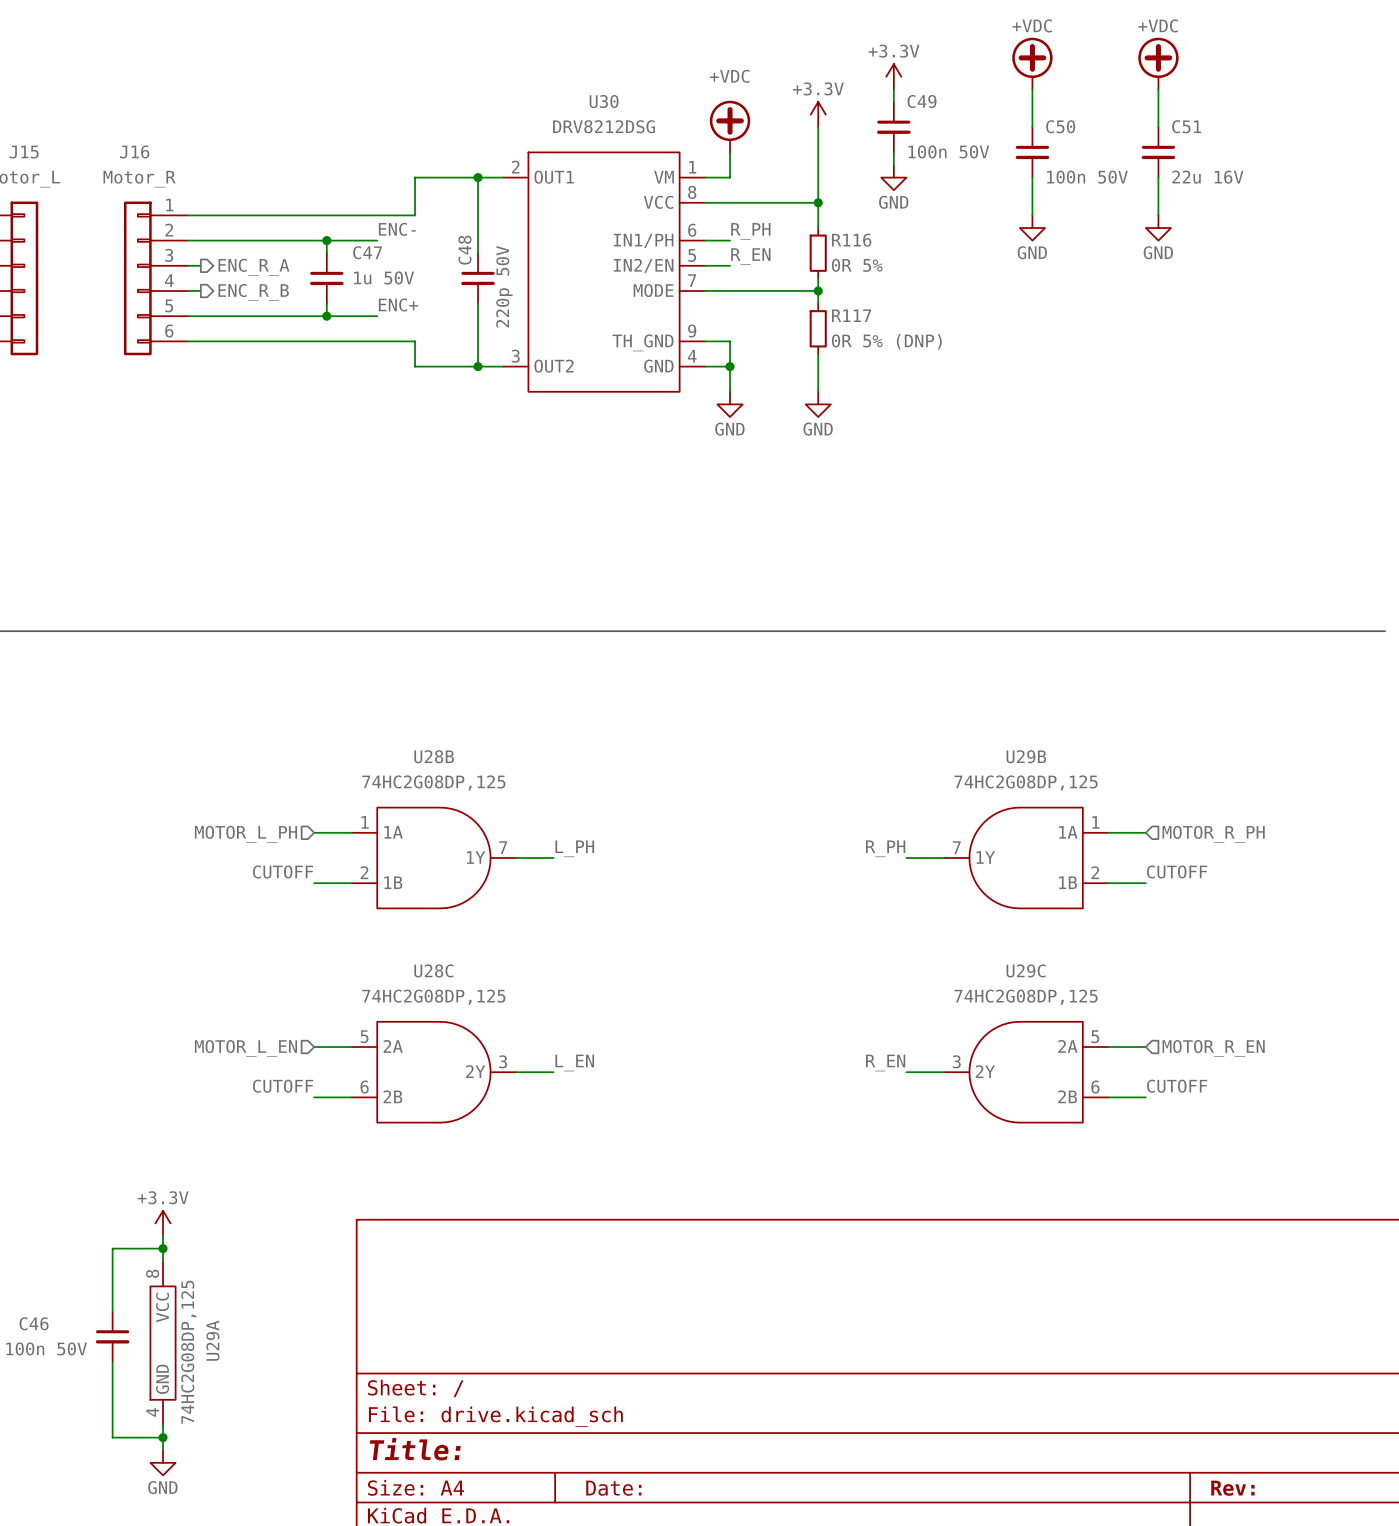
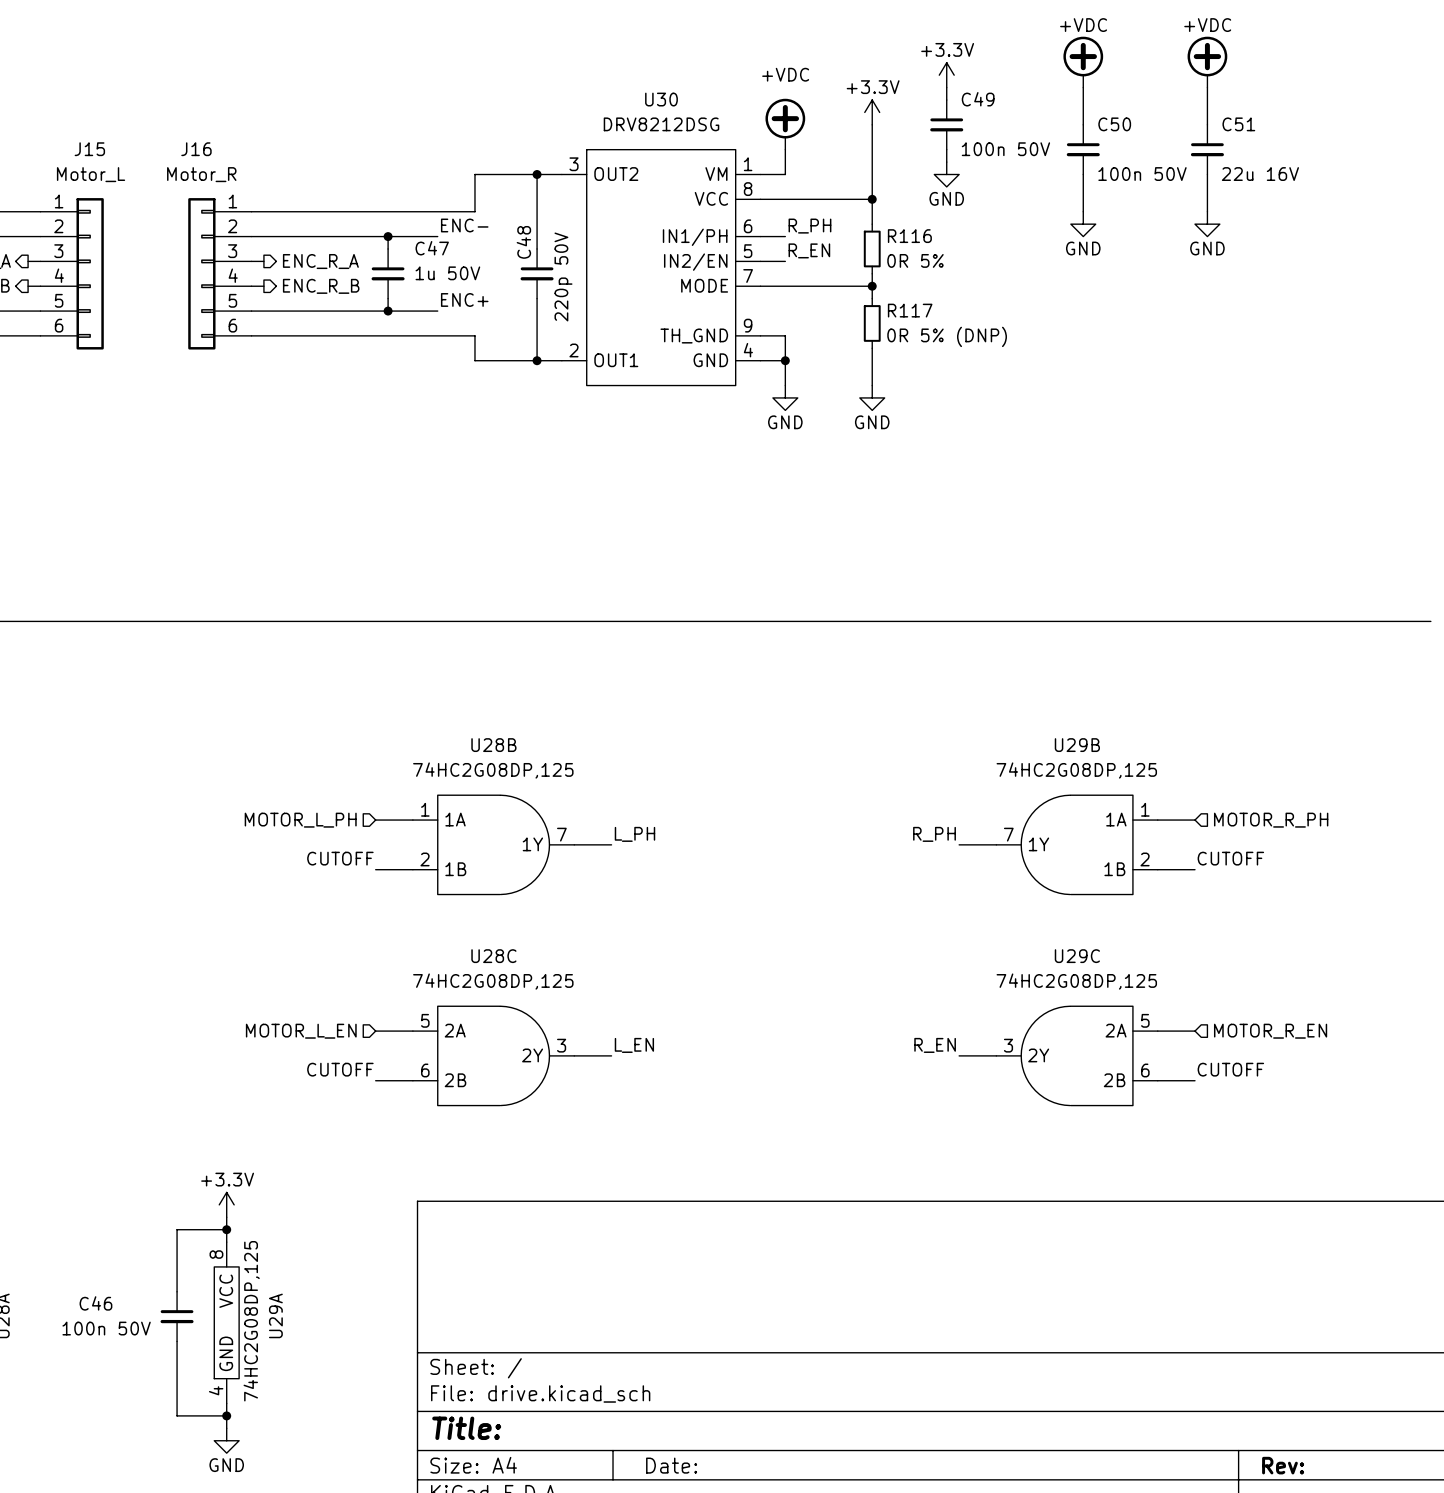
U30 pin number: 2 (515, 167) -> 3 (574, 164)
U30 pin name: OUT1 (554, 177) -> OUT2 (616, 174)
U30 pin number: 3 (515, 356) -> 2 (574, 350)
U30 pin name: OUT2 (554, 366) -> OUT1 (616, 360)

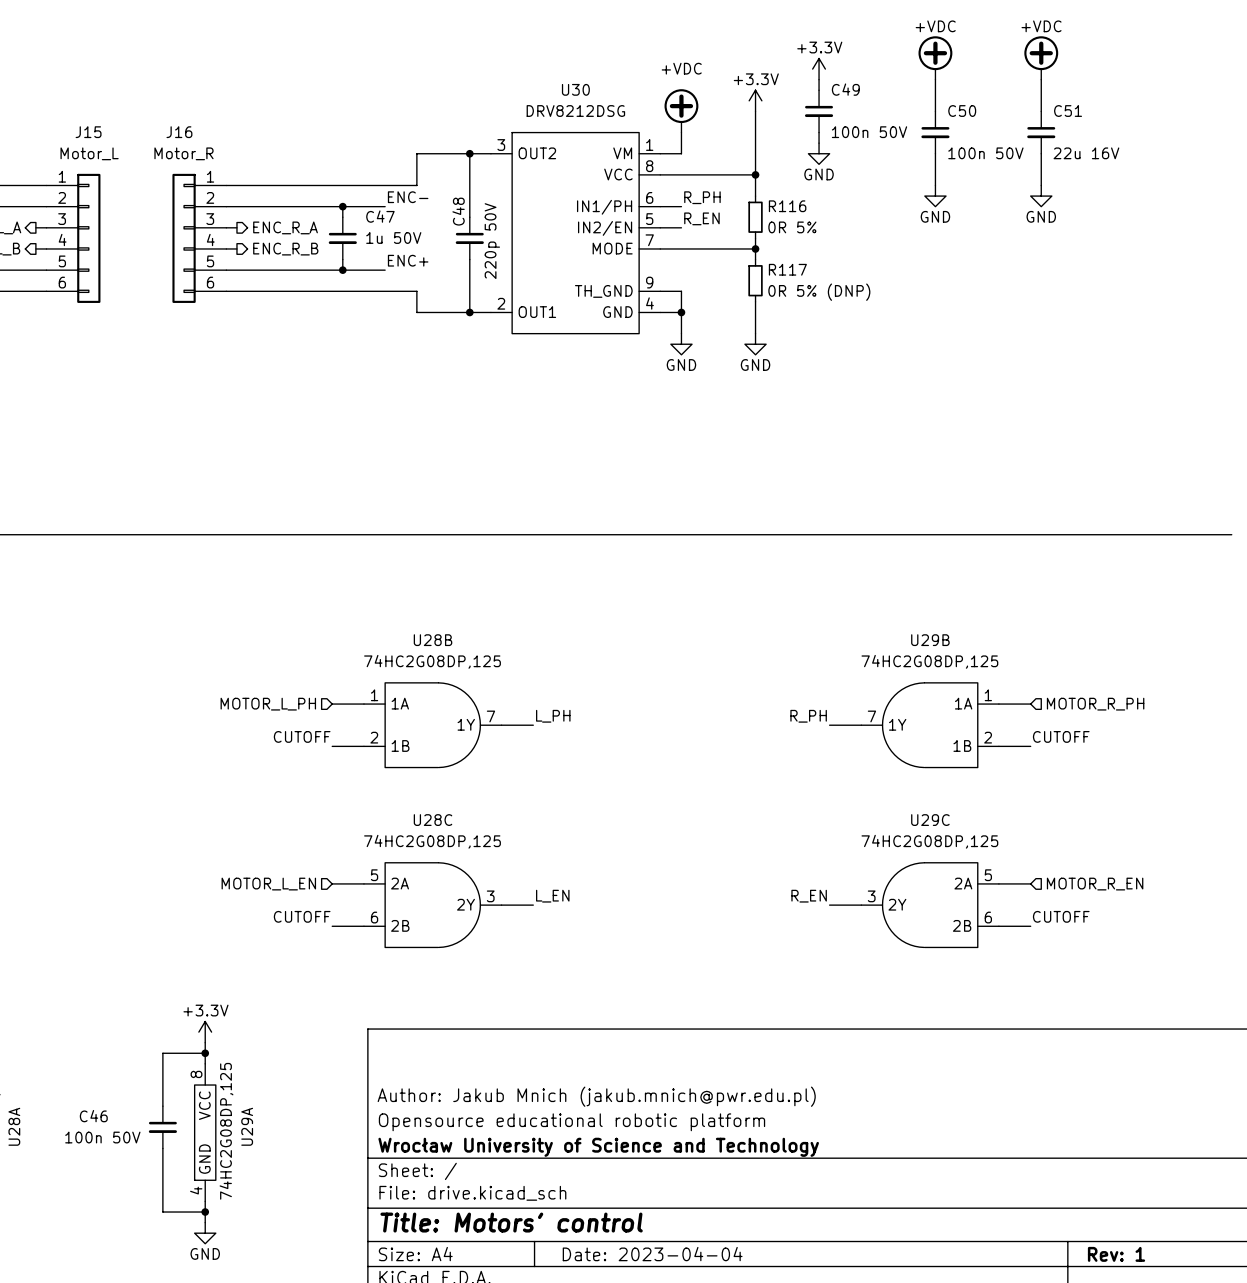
title block: none -> Author: Jakub Mnich (jakub.mnich@pwr.edu.pl) (596, 1096)
title block: none -> Opensource educational robotic platform (571, 1122)
title block: none -> Wrocław University of Science and Technology (598, 1147)
title block: Title: (466, 1428) -> Title: Motors' control (511, 1222)
title block: Date: (671, 1465) -> Date: 2023-04-04 (652, 1254)
title block: Rev: (1283, 1465) -> Rev: 1 (1116, 1254)

